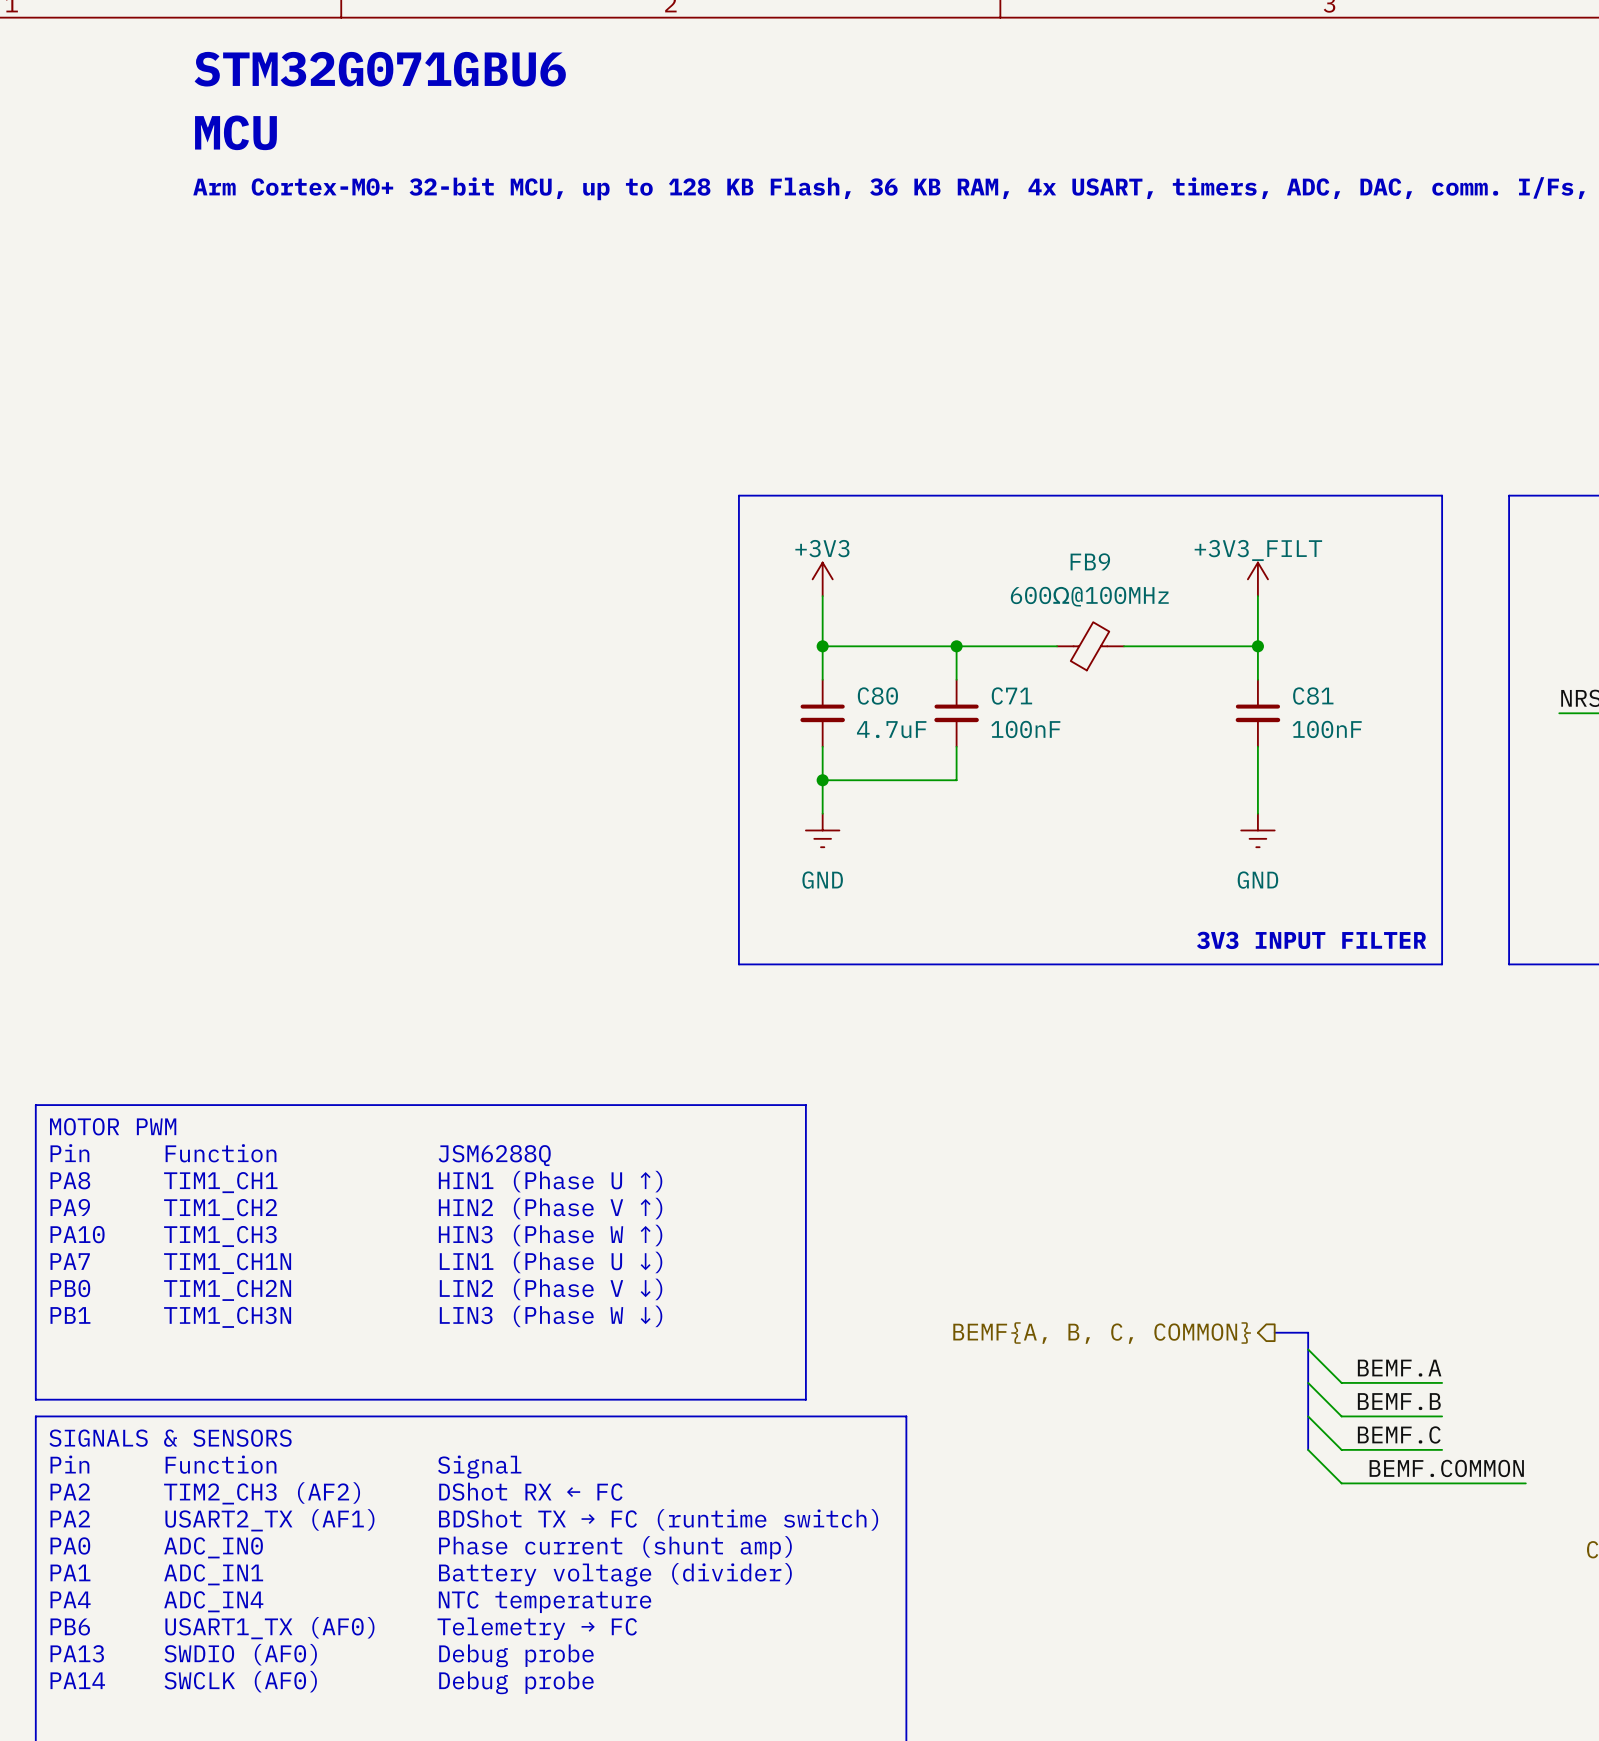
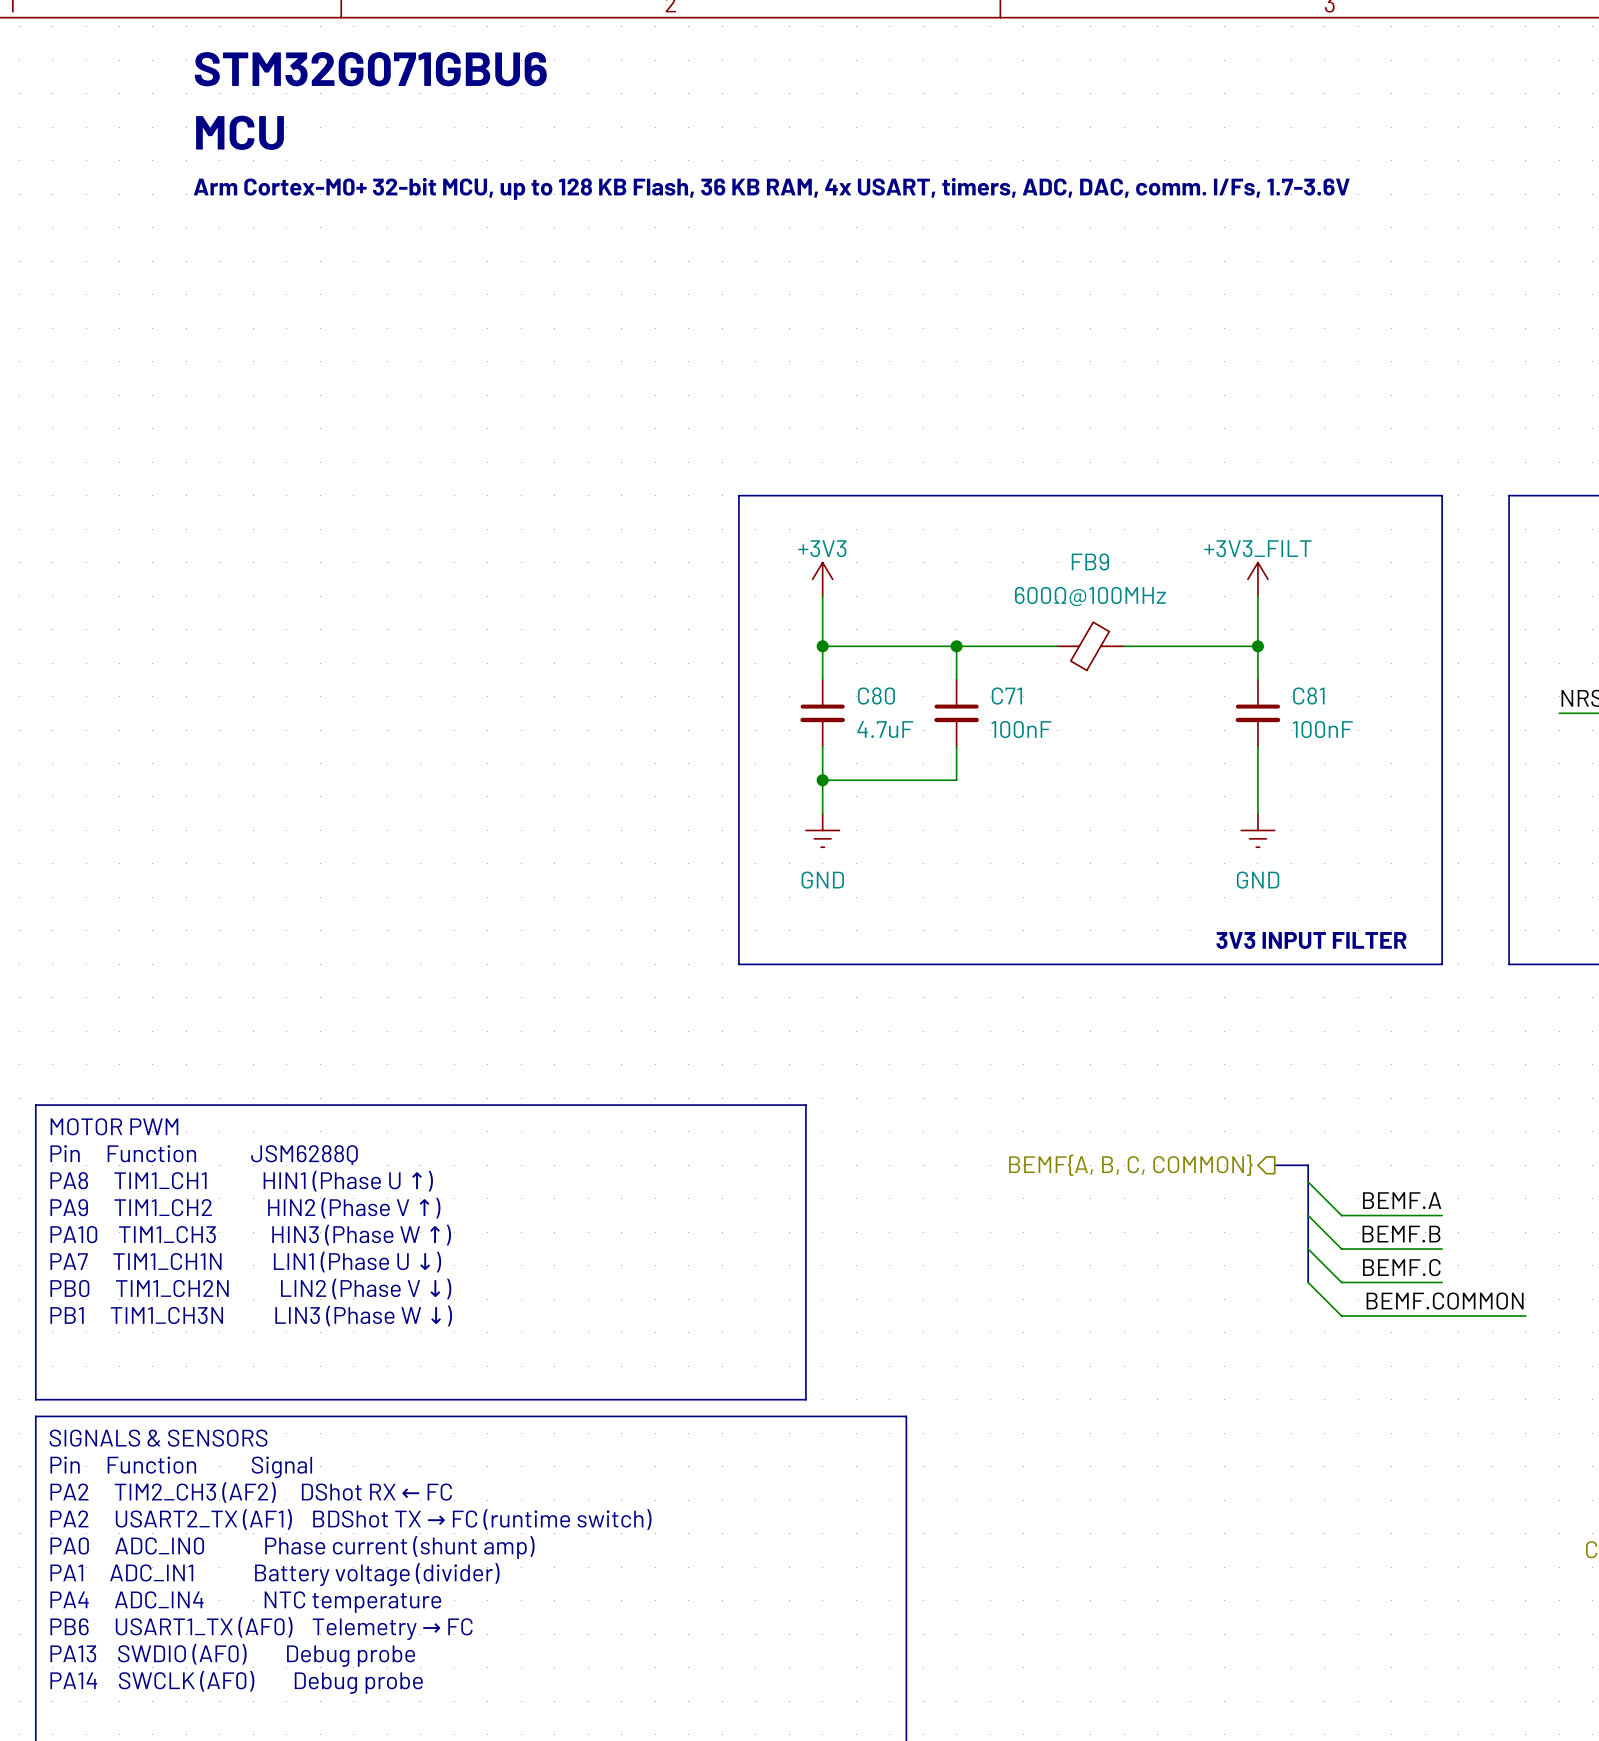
bus: (1274, 1332) (1308, 1332) (1308, 1449) -> (1274, 1165) (1308, 1165) (1308, 1282)
hierarchical label position: BEMF{A, B, C, COMMON} (1102, 1333) -> BEMF{A, B, C, COMMON} (1130, 1165)
wire: (1308, 1349) (1341, 1382) (1442, 1382) -> (1308, 1182) (1341, 1215) (1442, 1215)
label position: BEMF.A (1399, 1368) -> BEMF.A (1402, 1200)
wire: (1308, 1382) (1341, 1416) (1442, 1416) -> (1308, 1215) (1341, 1249) (1442, 1249)
label position: BEMF.B (1399, 1401) -> BEMF.B (1401, 1234)
wire: (1308, 1416) (1341, 1449) (1442, 1449) -> (1308, 1249) (1341, 1282) (1442, 1282)
label position: BEMF.C (1399, 1434) -> BEMF.C (1401, 1267)
wire: (1308, 1449) (1341, 1483) (1525, 1483) -> (1308, 1282) (1341, 1315) (1525, 1315)
label position: BEMF.COMMON (1446, 1468) -> BEMF.COMMON (1445, 1301)

